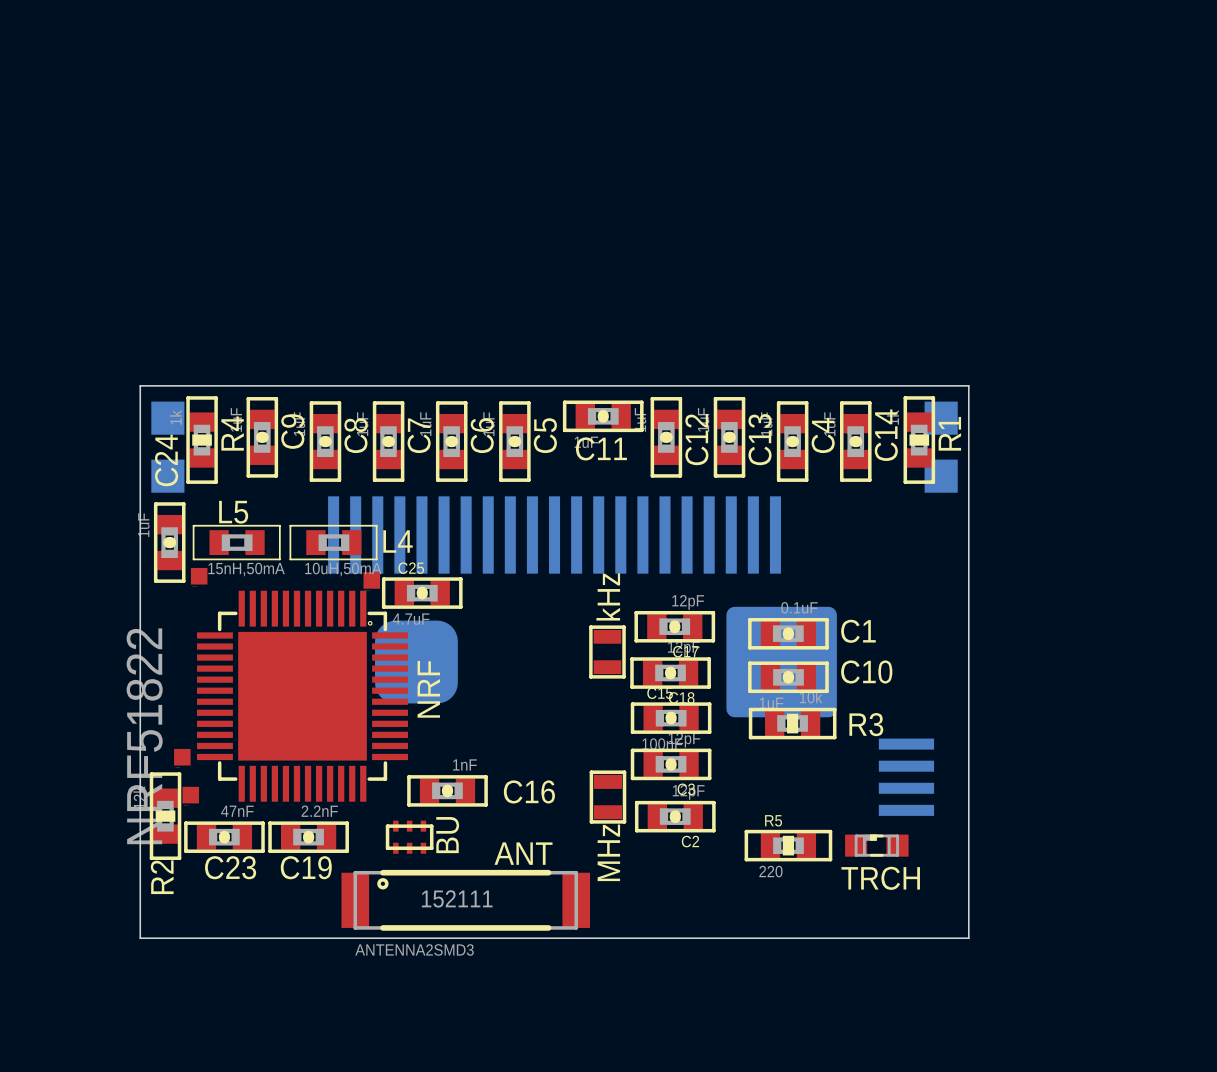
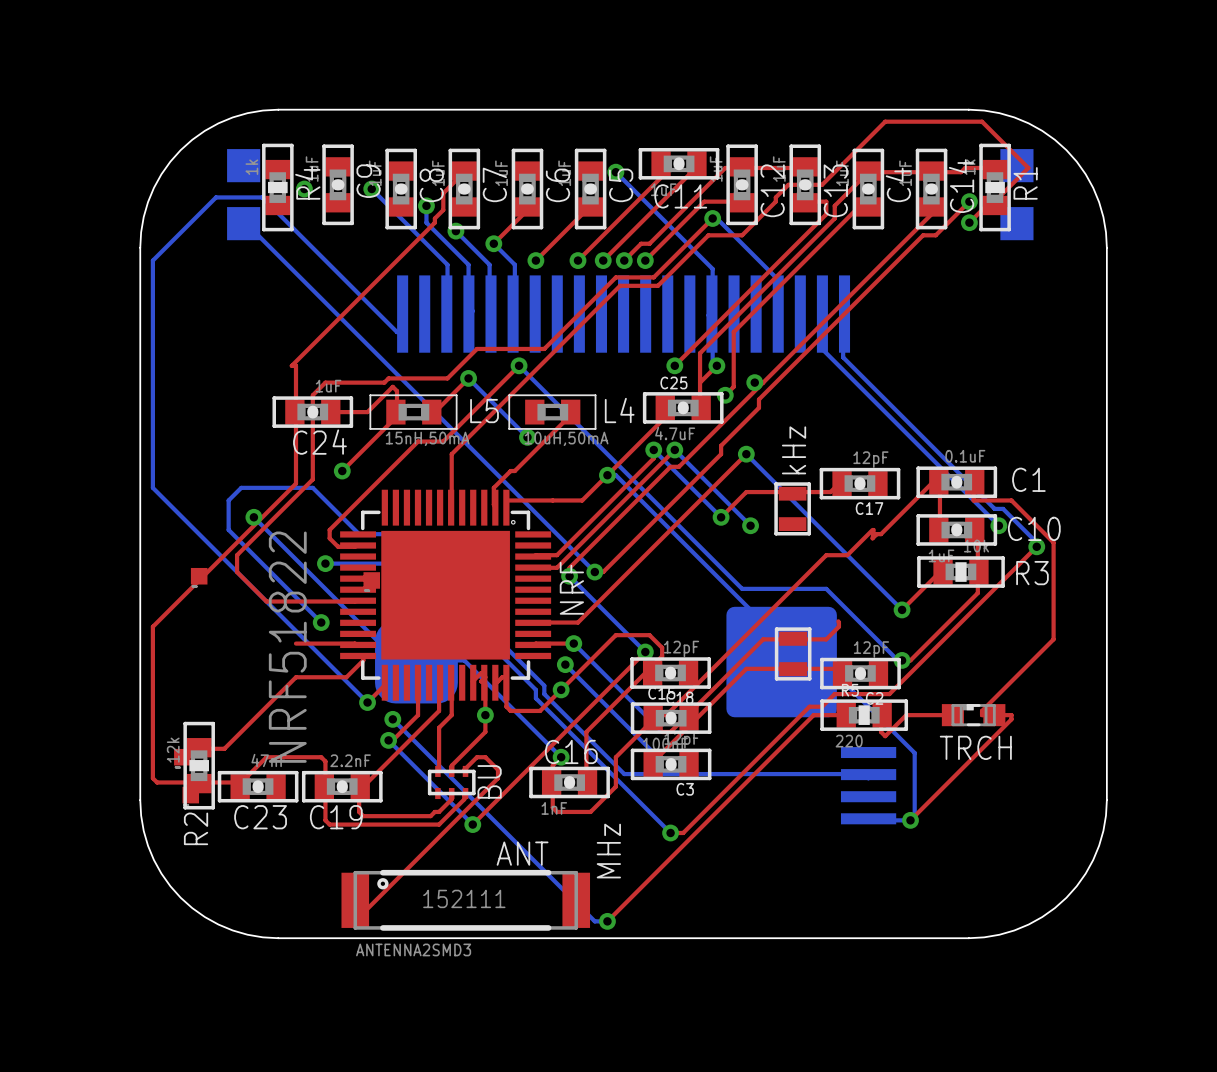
top track: none -> (661, 163) (662, 176) (577, 260)
top track: none -> (696, 163) (700, 163) (603, 260)
top track: none -> (805, 166) (805, 163) (801, 167) (742, 167) (742, 163) (737, 167) (725, 167) (649, 243) (641, 243) (624, 260)
top track: none -> (995, 169) (994, 167) (965, 167) (961, 172) (931, 172) (931, 167) (927, 172) (868, 172) (868, 167) (864, 172) (864, 176) (834, 205) (834, 218) (700, 353) (701, 407)
top track: none -> (464, 172) (443, 193) (443, 210) (434, 218) (434, 222) (291, 365) (295, 365) (295, 407) (291, 412) (295, 412) (295, 483) (152, 626) (152, 778) (157, 782) (199, 782) (199, 786) (203, 782) (232, 782) (237, 786)
bottom track: none -> (615, 172) (712, 268) (712, 311) (711, 314) (708, 315) (712, 319) (712, 361) (716, 365)
via: none -> (615, 172)
via: none -> (304, 189)
bottom track: none -> (371, 189) (447, 264) (446, 314)
via: none -> (371, 189)
top track: none -> (969, 201) (935, 235) (923, 235) (758, 399) (758, 407) (721, 445) (721, 454) (603, 572) (594, 572)
via: none -> (969, 201)
top track: none -> (742, 202) (704, 201) (645, 260)
top track: none -> (805, 202) (805, 205) (809, 201) (826, 201) (826, 214) (674, 365)
bottom track: none -> (426, 205) (426, 222) (468, 264) (468, 306) (472, 311) (468, 314)
via: none -> (426, 205)
top track: none -> (527, 206) (527, 210) (493, 243)
top track: none -> (590, 206) (535, 260)
top track: none -> (868, 206) (859, 205) (733, 332) (733, 386) (725, 395)
top track: none -> (931, 206) (931, 214) (679, 466) (670, 466) (569, 567) (569, 576)
top track: none -> (712, 218) (653, 277) (615, 277) (544, 348) (476, 348) (447, 378) (388, 378) (384, 382) (325, 382) (312, 395) (312, 479) (237, 555) (237, 572) (266, 601) (358, 600)
bottom track: none -> (712, 218) (716, 218) (780, 281) (780, 311) (778, 314)
via: none -> (712, 218)
top track: none -> (969, 222) (986, 205) (990, 205) (1028, 167) (982, 121) (885, 121) (822, 184) (788, 184) (775, 197) (775, 201) (742, 235) (708, 235) (657, 285) (620, 285) (451, 454) (451, 507)
via: none -> (969, 222)
bottom track: none -> (243, 223) (245, 222) (594, 572)
bottom track: none -> (455, 231) (489, 264) (489, 306) (493, 311) (491, 314)
via: none -> (455, 231)
bottom track: none -> (493, 243) (514, 264) (514, 311) (513, 314)
via: none -> (493, 243)
via: none -> (535, 260)
via: none -> (577, 260)
via: none -> (603, 260)
via: none -> (624, 260)
via: none -> (645, 260)
bottom track: none -> (402, 314) (401, 332) (397, 332) (262, 197) (216, 197) (152, 260) (152, 487) (367, 702)
bottom track: none -> (822, 314) (822, 348) (998, 525)
bottom track: none -> (844, 314) (843, 357) (994, 508) (1003, 508) (1036, 542) (1036, 546)
top track: none -> (519, 365) (443, 441) (418, 441) (329, 529) (329, 538) (338, 546) (358, 545)
bottom track: none -> (519, 365) (742, 588) (826, 588) (897, 660) (902, 660)
via: none -> (519, 365)
via: none -> (674, 365)
top track: none -> (716, 365) (700, 382)
via: none -> (716, 365)
top track: none -> (468, 378) (434, 412) (431, 412)
bottom track: none -> (468, 378) (527, 437)
via: none -> (468, 378)
via: none -> (754, 382)
board edge: (140, 385) (968, 385) (968, 938) -> (140, 385) (140, 247) (141, 232) (148, 202) (161, 174) (170, 161) (192, 139) (218, 123) (247, 113) (278, 109) (968, 109) (984, 110) (1014, 117) (1042, 130) (1066, 150) (1085, 174) (1099, 202) (1106, 232) (1106, 815) (1099, 845) (1085, 873) (1076, 886) (1054, 908) (1042, 917) (1014, 930) (984, 937) (968, 938)
via: none -> (725, 395)
top track: none -> (665, 407) (666, 416) (582, 500) (506, 500) (506, 507)
top track: none -> (330, 412) (367, 412) (392, 386) (397, 391) (397, 407) (392, 412) (397, 412) (397, 416) (342, 471)
top track: none -> (570, 412) (573, 412) (514, 471) (510, 471) (493, 487) (495, 507)
C11 position: (603, 416) -> (679, 163)
C9 position: (262, 437) -> (338, 184)
via: none -> (527, 437)
C12 position: (666, 437) -> (742, 184)
C13 position: (729, 437) -> (805, 184)
R4 position: (202, 440) -> (277, 187)
R1 position: (919, 440) -> (995, 187)
C8 position: (325, 441) -> (401, 189)
C7 position: (388, 441) -> (464, 189)
C6 position: (451, 441) -> (527, 189)
C5 position: (514, 441) -> (590, 189)
C4 position: (792, 441) -> (868, 189)
C14 position: (855, 441) -> (931, 189)
part position: (167, 447) -> (243, 194)
part position: (941, 447) -> (1016, 194)
top track: none -> (653, 449) (653, 458) (556, 555) (533, 556)
bottom track: none -> (653, 449) (721, 517)
via: none -> (653, 449)
top track: none -> (674, 449) (556, 567) (533, 567)
bottom track: none -> (674, 449) (750, 525)
via: none -> (674, 449)
top track: none -> (746, 454) (577, 622) (533, 622)
bottom track: none -> (746, 454) (902, 609)
via: none -> (746, 454)
C24 name position: C24 (166, 460) -> C24 (319, 442)
via: none -> (342, 471)
bottom track: none -> (607, 475) (615, 475) (801, 660) (781, 662) (784, 660) (822, 660) (914, 753) (914, 820) (876, 820) (872, 816) (868, 818)
via: none -> (607, 475)
top track: none -> (974, 482) (977, 483) (973, 487) (973, 500) (1011, 500) (1053, 542) (1053, 639) (982, 710) (982, 715) (1011, 715) (1011, 719) (910, 820)
top track: none -> (842, 483) (838, 483) (830, 492) (796, 492) (792, 496) (792, 492) (746, 492) (721, 517)
part: none -> (792, 508)
L5 name position: L5 (233, 512) -> L5 (484, 411)
bottom track: none -> (253, 517) (397, 660) (409, 660) (413, 664) (418, 660) (464, 660) (561, 757)
via: none -> (253, 517)
via: none -> (721, 517)
via: none -> (750, 525)
via: none -> (998, 525)
top track: none -> (872, 529) (847, 555) (826, 555) (666, 715) (657, 715) (615, 757) (615, 786) (590, 811) (556, 811) (552, 807) (552, 782) (548, 782) (552, 778) (552, 765) (561, 757)
top track: none -> (873, 529) (872, 538) (876, 534) (881, 534) (935, 479) (939, 483) (939, 525) (935, 529) (938, 529)
top track: none -> (974, 529) (977, 529) (973, 534) (977, 538) (977, 572) (982, 572) (977, 576) (977, 593) (910, 660) (902, 660)
part position: (554, 534) -> (623, 314)
C24 rotation: 0° (169, 542) -> 90° clockwise (312, 412)
C24 position: (169, 542) -> (312, 412)
L5 position: (236, 542) -> (413, 412)
L4 position: (333, 542) -> (552, 412)
top track: none -> (1036, 546) (889, 694) (834, 694) (822, 706) (809, 706) (683, 832) (670, 832)
via: none -> (1036, 546)
bottom track: none -> (325, 563) (409, 563) (535, 689) (535, 698) (670, 832)
via: none -> (325, 563)
via: none -> (594, 572)
top track: none -> (943, 572) (939, 572) (902, 609)
bottom track: none -> (569, 576) (645, 652)
via: none -> (569, 576)
C25 position: (422, 593) -> (683, 407)
text position: kHz (608, 597) -> kHz (794, 450)
via: none -> (902, 609)
top track: none -> (838, 621) (838, 626) (826, 639) (796, 639) (793, 638) (792, 635) (788, 639) (763, 639) (670, 731) (662, 731)
bottom track: none -> (321, 622) (228, 529) (228, 500) (241, 487) (312, 487) (359, 534) (392, 534) (544, 685) (544, 694) (624, 774) (864, 774) (868, 778) (868, 774)
via: none -> (321, 622)
C17 position: (674, 626) -> (859, 483)
C1 position: (788, 633) -> (956, 482)
top track: none -> (295, 643) (358, 644)
top track: none -> (573, 643) (533, 644)
bottom track: none -> (573, 643) (662, 731)
via: none -> (573, 643)
part: (607, 652) -> none
top track: none -> (645, 652) (472, 824)
via: none -> (645, 652)
part: none -> (793, 653)
top track: none -> (358, 655) (363, 656) (363, 660) (346, 677) (295, 677) (224, 748) (199, 747)
via: none -> (902, 660)
bottom track: none -> (565, 664) (657, 757)
via: none -> (565, 664)
C10 name position: C10 (866, 671) -> C10 (1034, 528)
top track: none -> (842, 673) (834, 668) (801, 668) (796, 673) (792, 668) (746, 668) (657, 757)
C10 position: (788, 677) -> (956, 529)
top track: none -> (384, 682) (384, 685) (367, 702)
top track: none -> (417, 682) (418, 715) (392, 740) (388, 740)
top track: none -> (440, 682) (439, 710) (359, 790) (359, 811) (363, 816) (430, 816) (434, 811) (439, 811) (451, 799) (451, 793)
top track: none -> (451, 682) (451, 715) (439, 727) (437, 771)
top track: none -> (473, 682) (481, 673) (485, 677) (481, 681) (485, 685) (485, 731) (451, 765) (451, 771)
top track: none -> (495, 682) (502, 677) (506, 677) (506, 706) (510, 710) (540, 710) (615, 635) (649, 635) (662, 647) (662, 656) (586, 731) (587, 782)
via: none -> (561, 689)
NRF position: (302, 696) -> (445, 595)
via: none -> (367, 702)
via: none -> (485, 715)
top track: none -> (846, 715) (813, 715) (607, 921)
top track: none -> (882, 715) (885, 715) (881, 719) (881, 731) (885, 736) (906, 715) (952, 715)
bottom track: none -> (392, 719) (594, 921) (607, 921)
via: none -> (392, 719)
R3 position: (792, 723) -> (961, 572)
bottom track: none -> (388, 740) (472, 824)
via: none -> (388, 740)
via: none -> (561, 757)
C16 value position: 1nF (464, 764) -> 1nF (554, 808)
top track: none -> (465, 771) (464, 769) (476, 757) (485, 757) (498, 769) (498, 778) (359, 917) (354, 917) (354, 904) (359, 900) (355, 900)
part position: (906, 777) -> (868, 785)
top track: none -> (237, 786) (266, 757) (321, 757) (325, 761) (325, 782) (321, 786) (325, 786) (325, 820) (329, 824) (439, 824) (464, 799) (465, 793)
C16 position: (447, 790) -> (569, 782)
C16 name position: C16 (529, 791) -> C16 (571, 751)
part: (607, 797) -> none
board edge: (140, 800) (140, 938) (278, 938) -> (140, 800) (141, 815) (148, 845) (161, 873) (180, 897) (204, 917) (232, 930) (262, 937) (278, 938)
R2 position: (165, 816) -> (199, 765)
C2 position: (675, 816) -> (860, 673)
via: none -> (910, 820)
via: none -> (472, 824)
via: none -> (670, 832)
C23 position: (224, 837) -> (258, 786)
C19 position: (308, 837) -> (342, 786)
BU position: (409, 837) -> (451, 782)
R5 position: (788, 845) -> (864, 715)
TRCH position: (876, 845) -> (973, 715)
via: none -> (607, 921)

